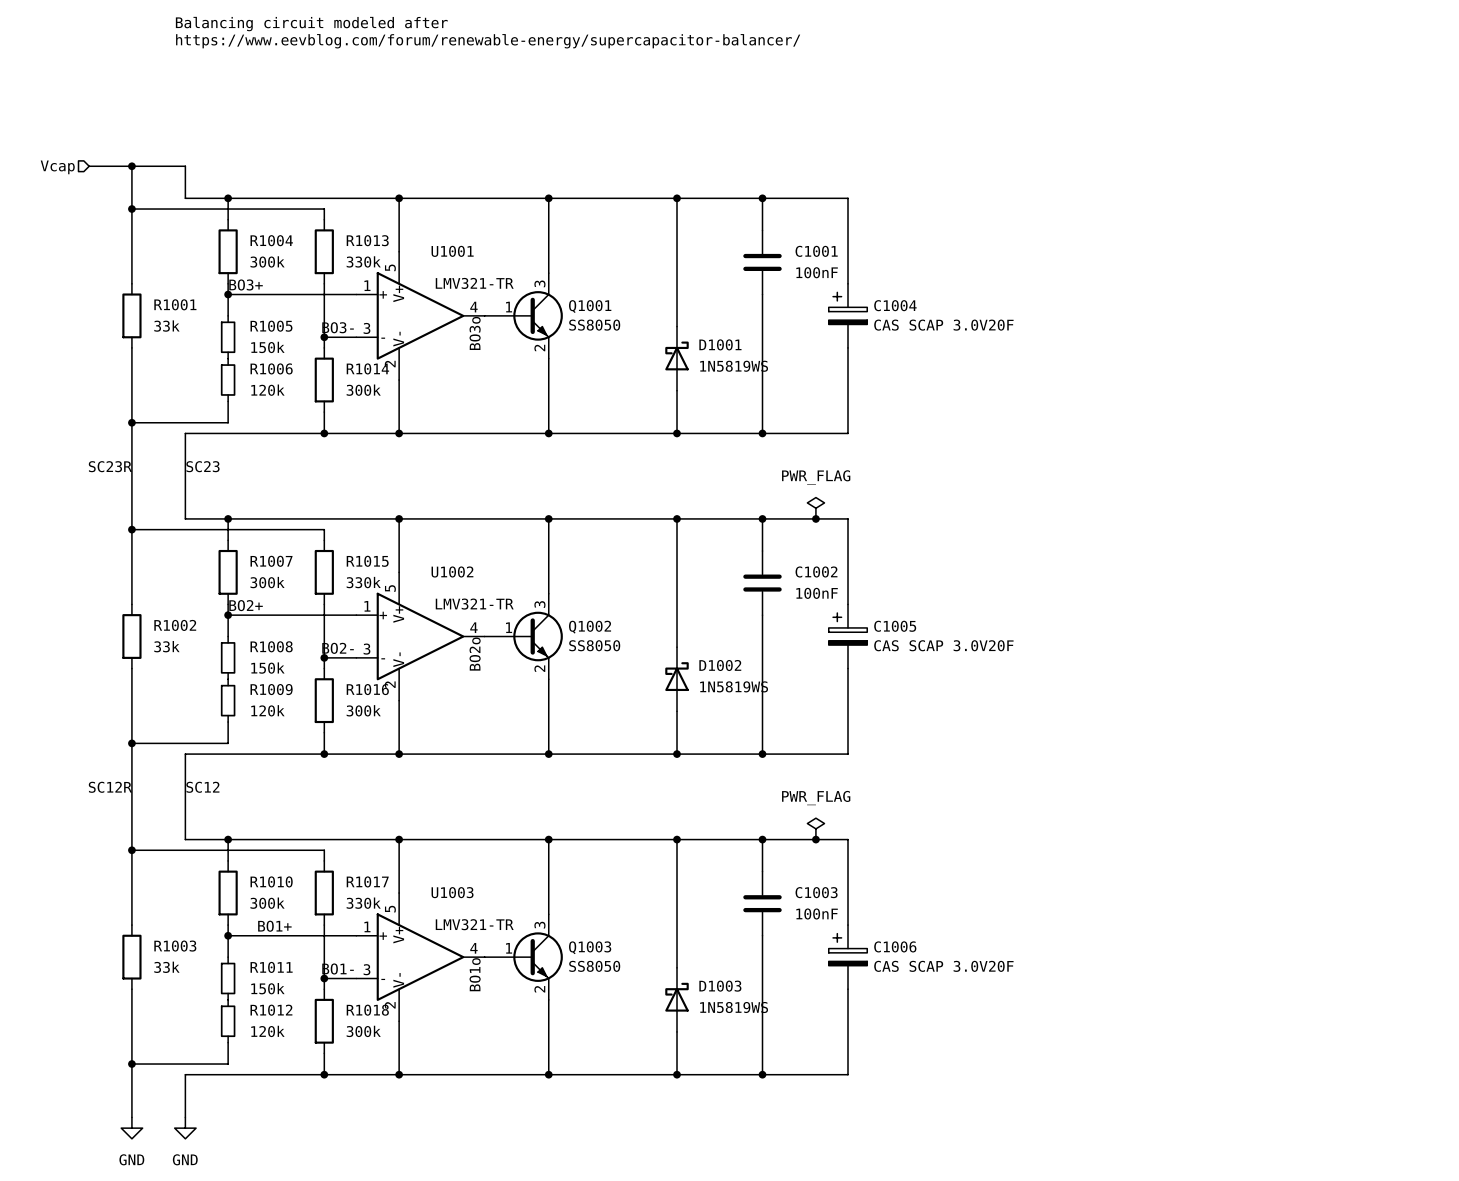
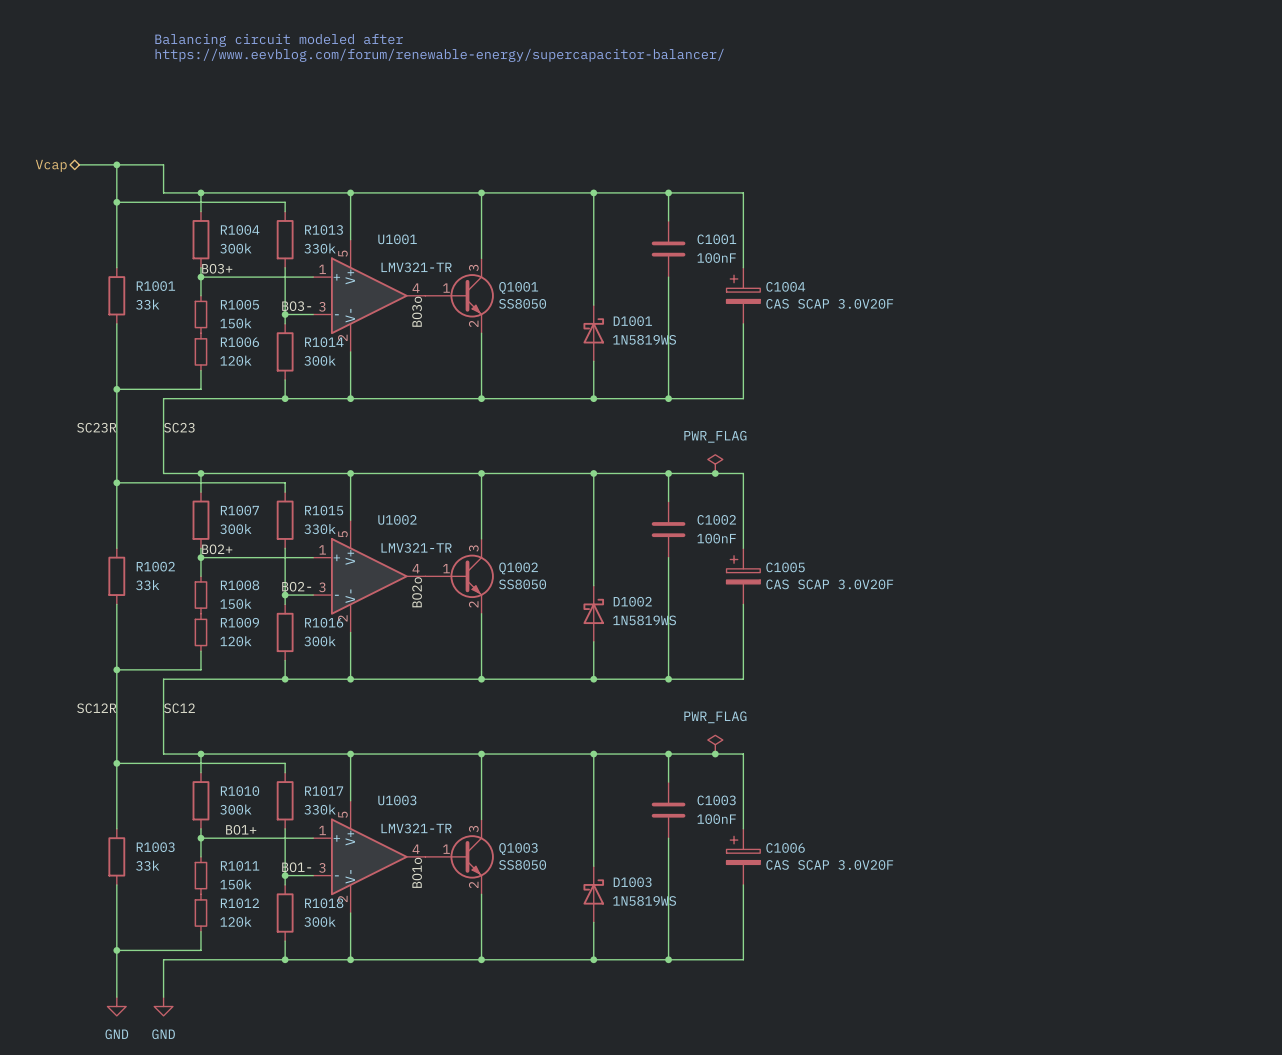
hierarchical label shape: input (57, 167) -> bidirectional (51, 165)

